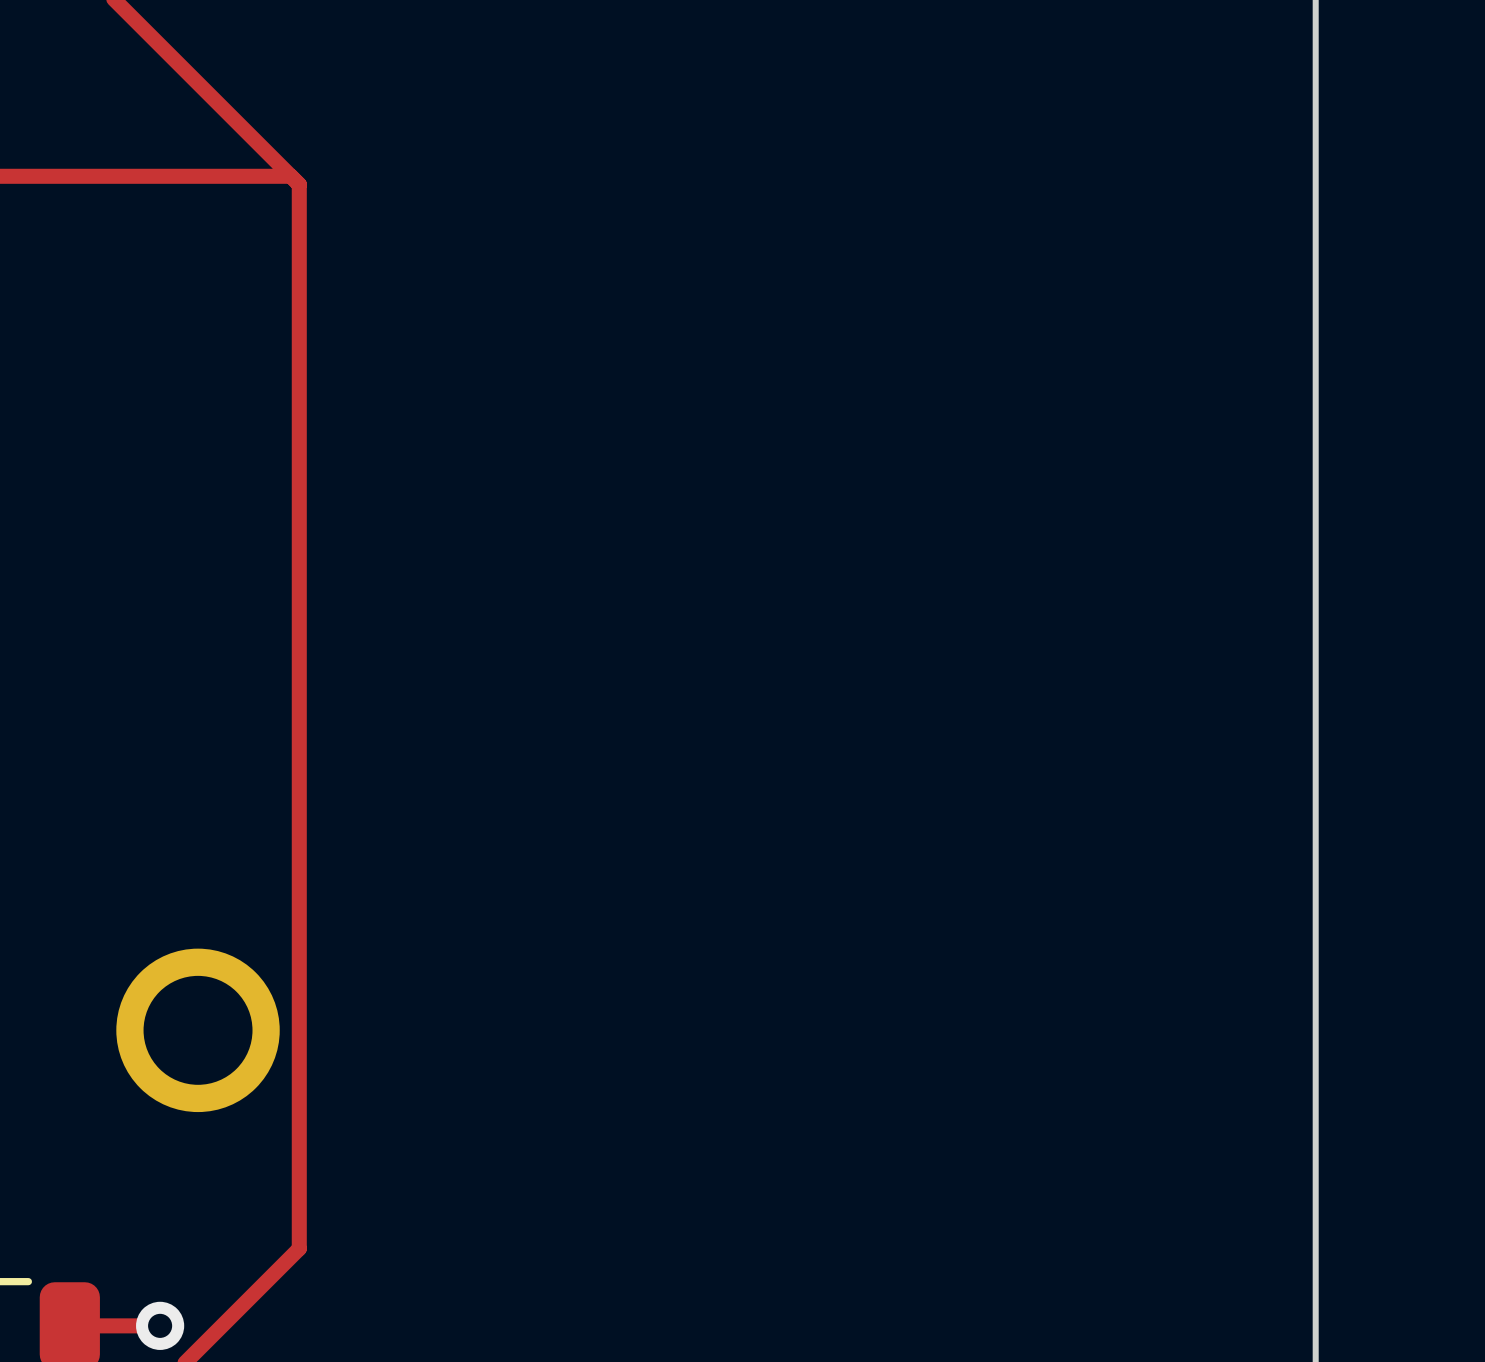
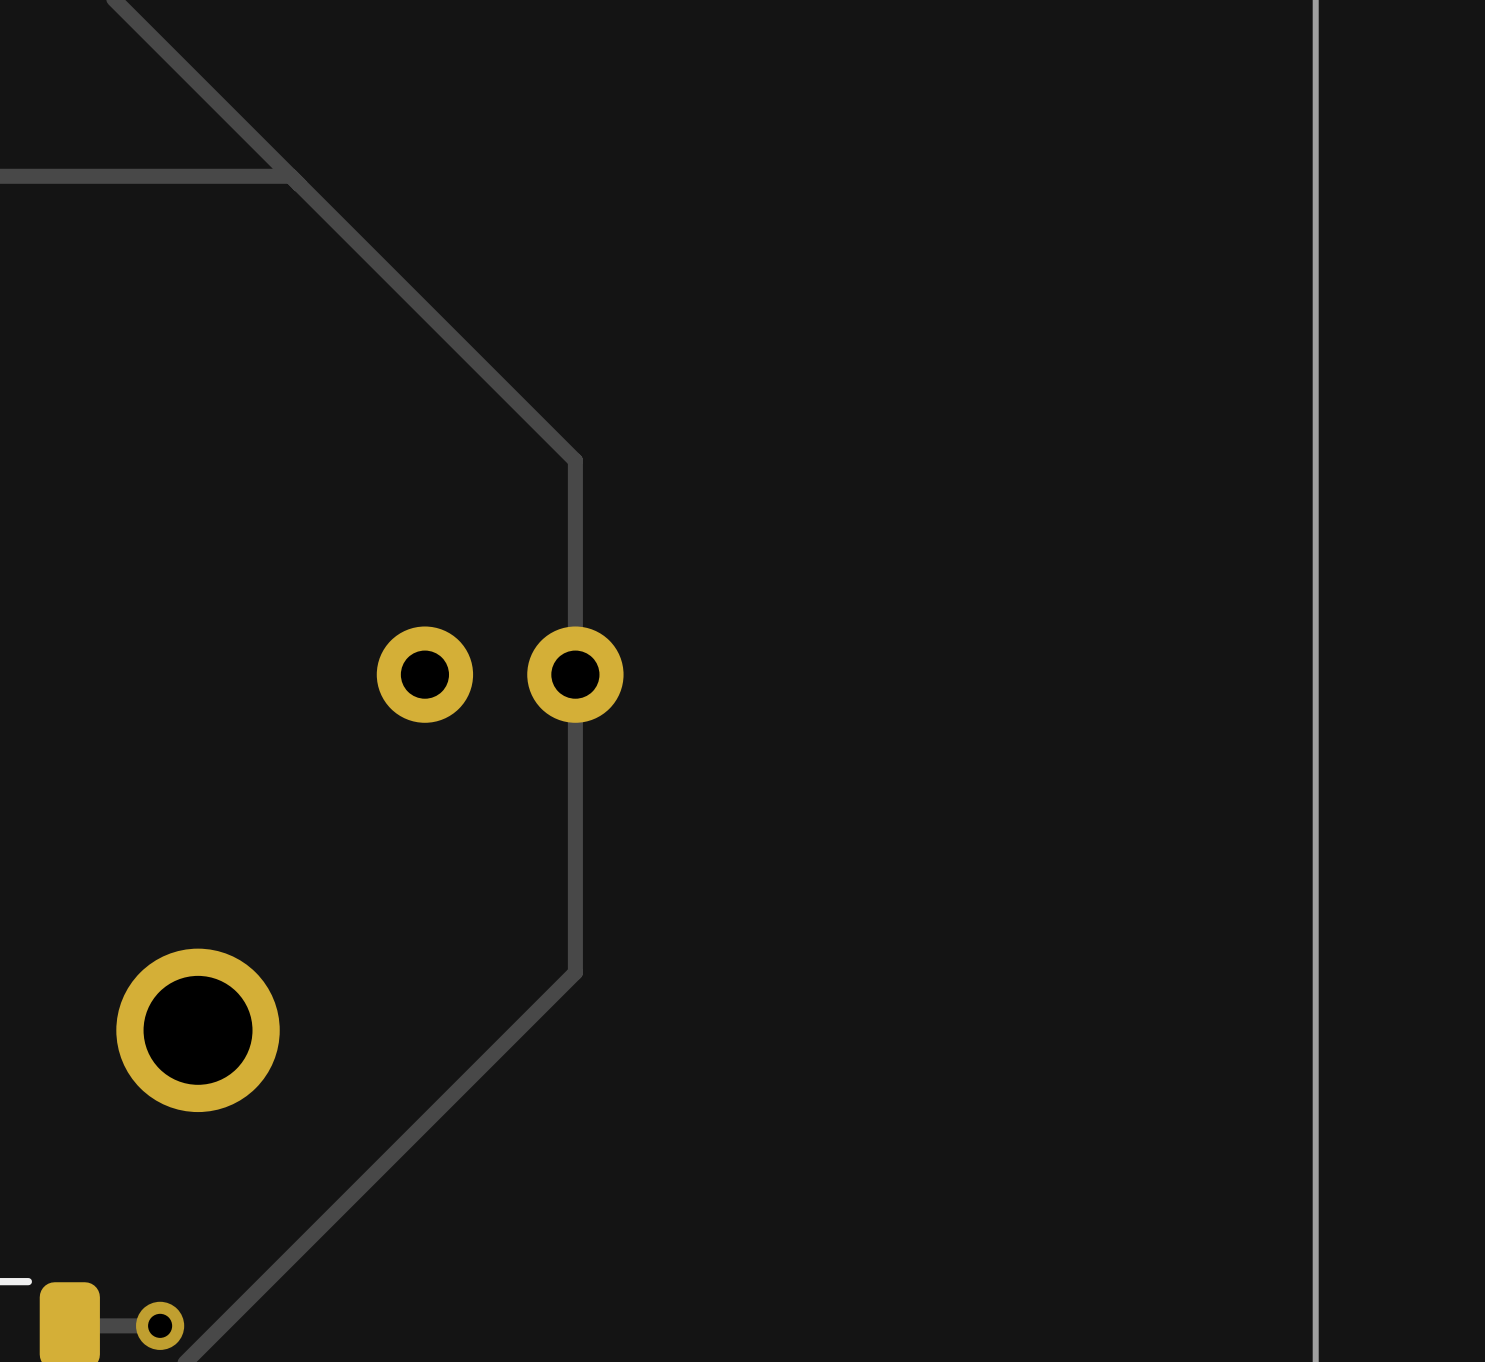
track: (299, 184) (299, 1248) -> (299, 184) (575, 460) (575, 972) (299, 1248)
part: none -> (500, 674)

